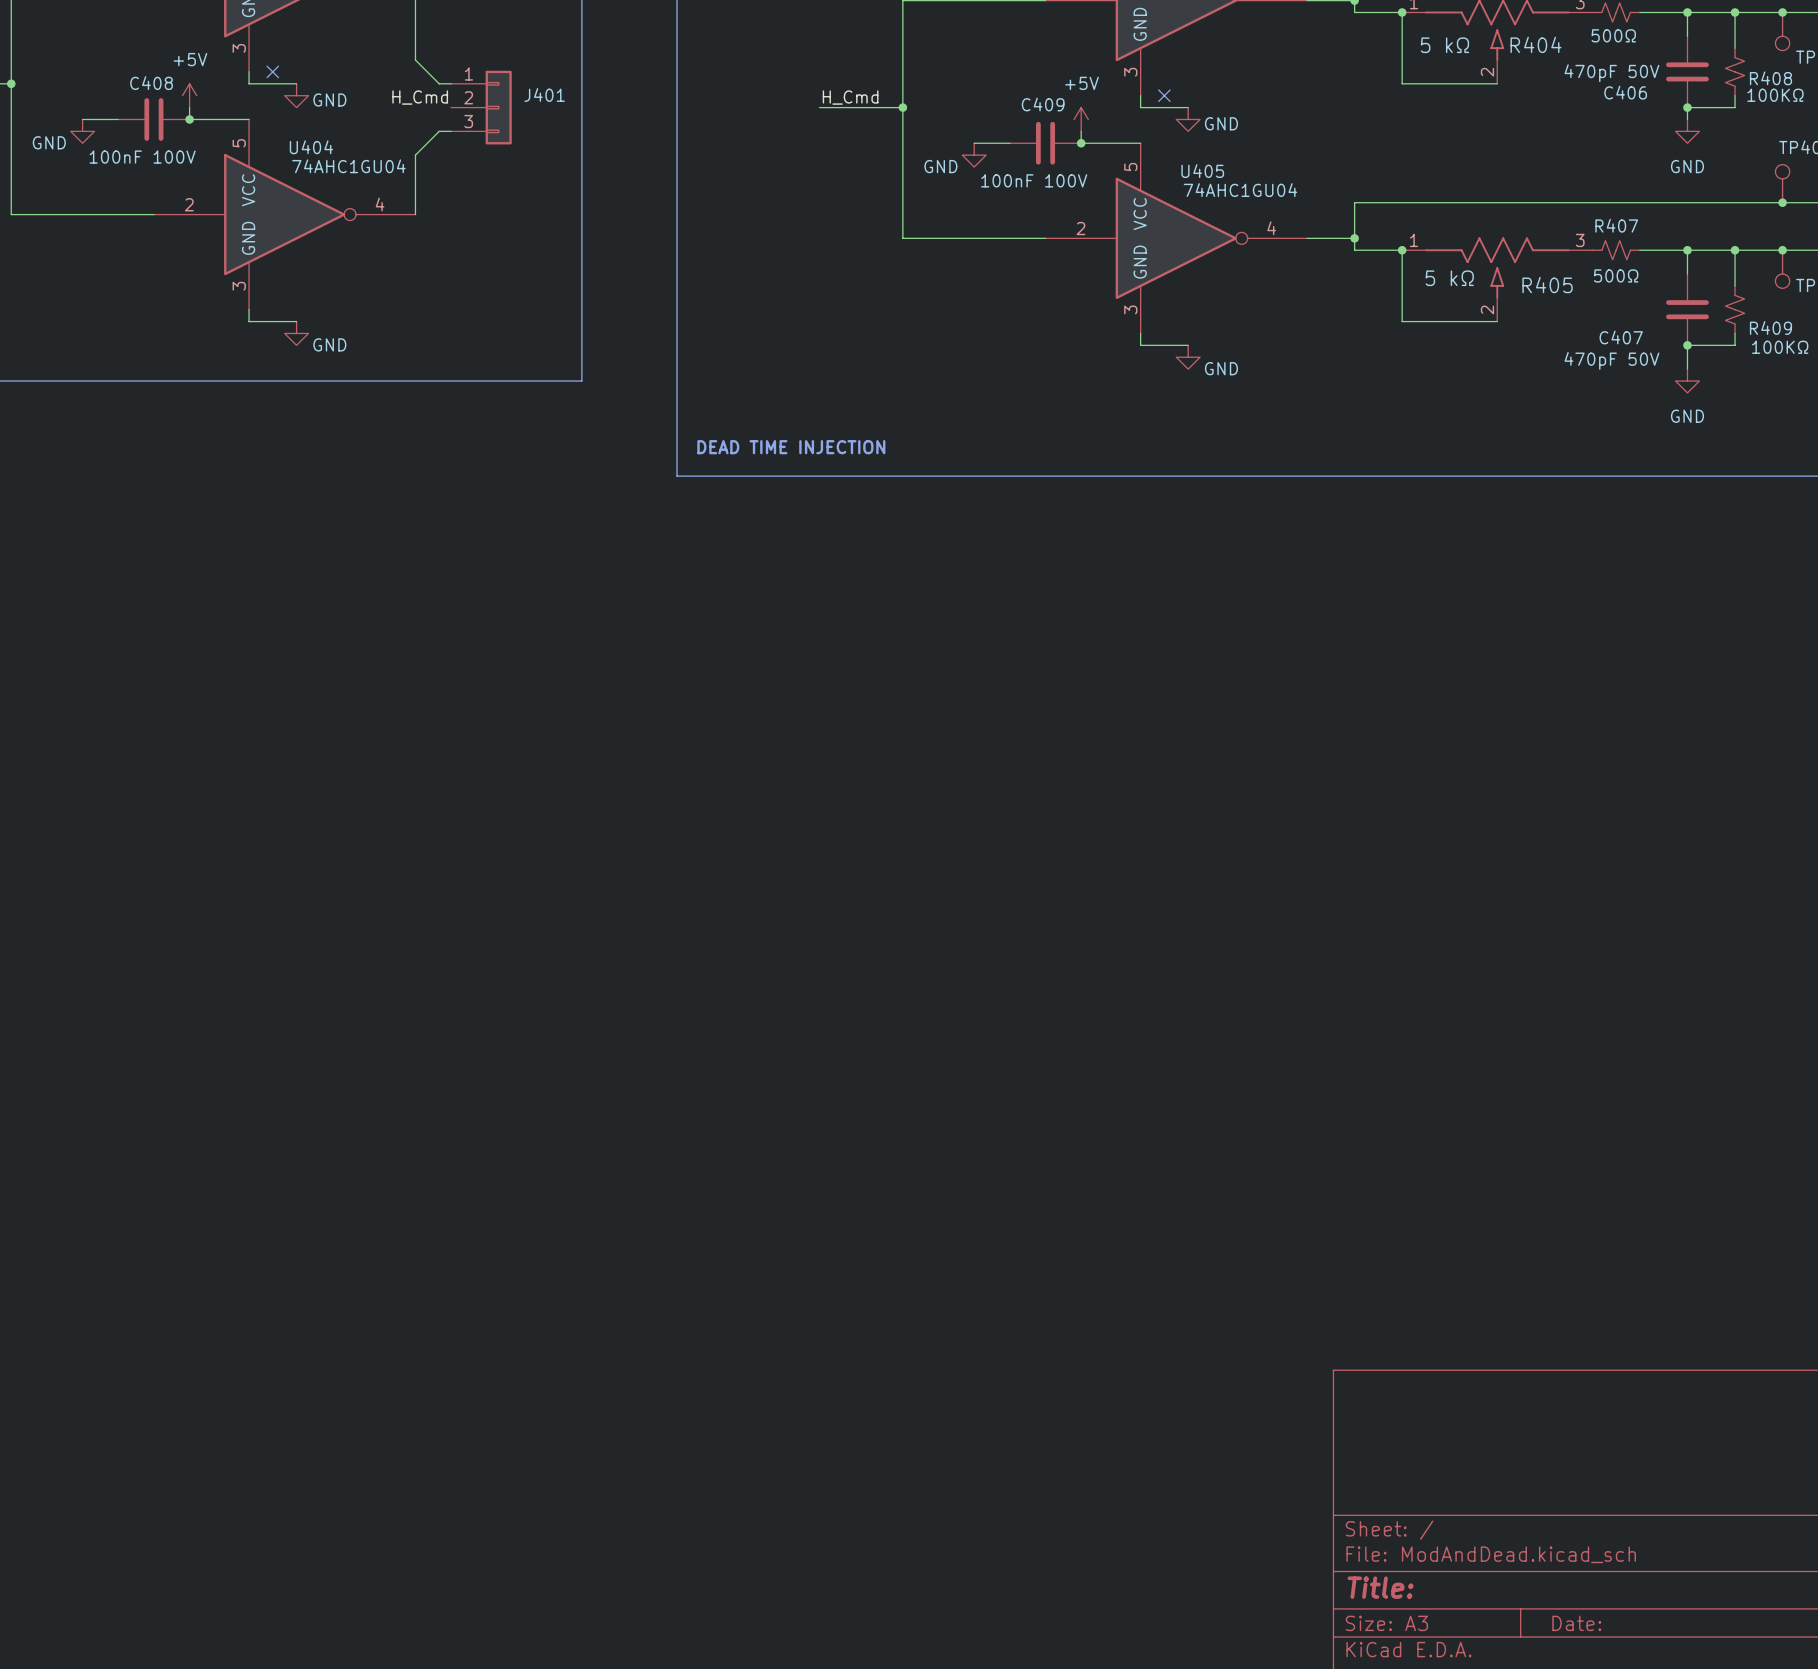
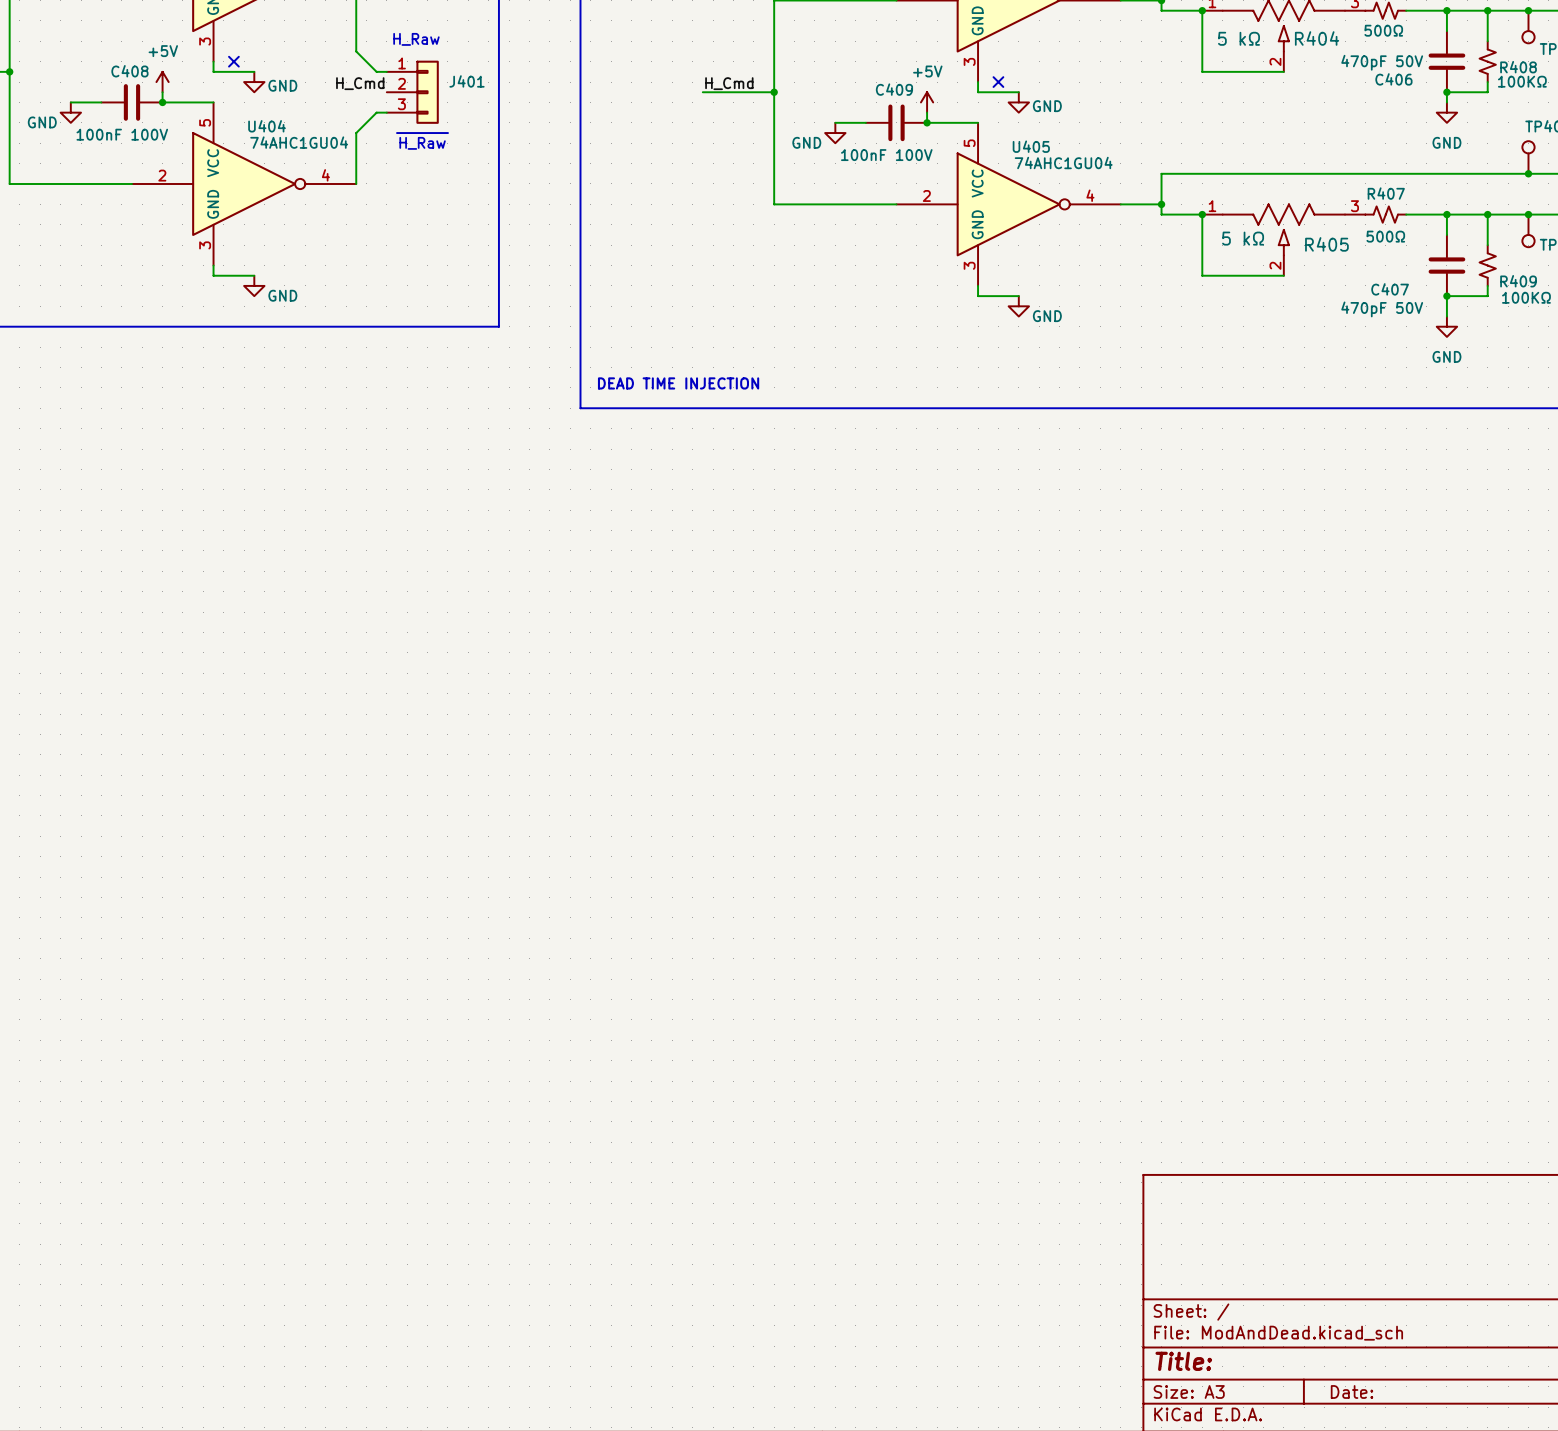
text: none -> H_Raw (416, 39)
line: none -> (397, 133) (447, 133)
text: none -> H_Raw (422, 143)

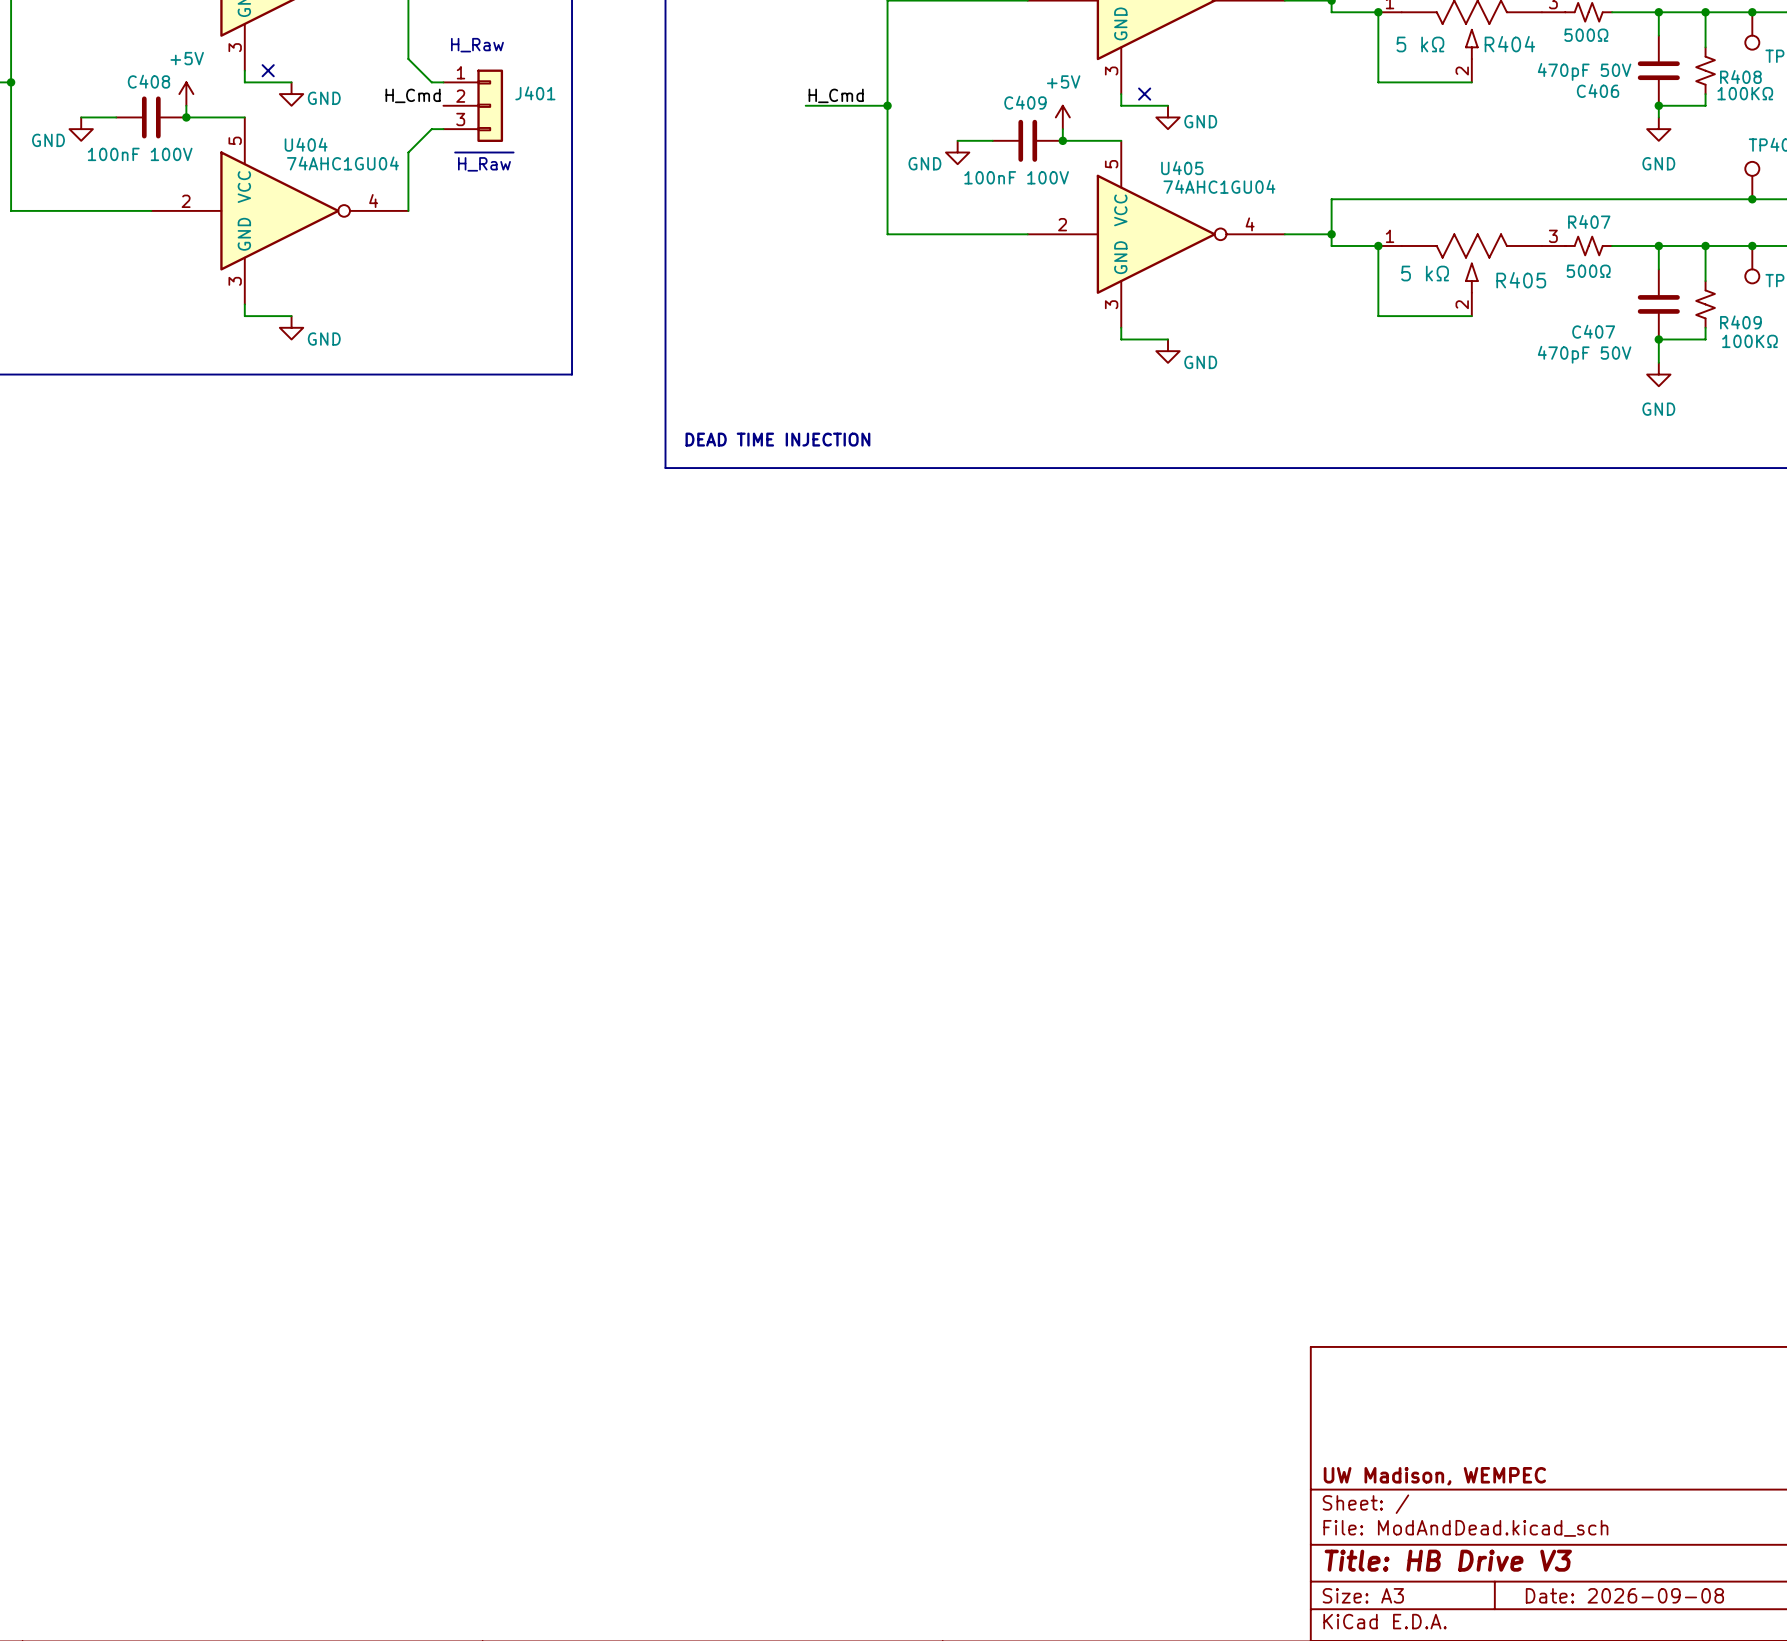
title block: none -> UW Madison, WEMPEC (1434, 1476)
title block: Title: (1183, 1361) -> Title: HB Drive V3 (1448, 1560)
title block: Date: (1352, 1391) -> Date: 2026-09-08 (1624, 1595)

